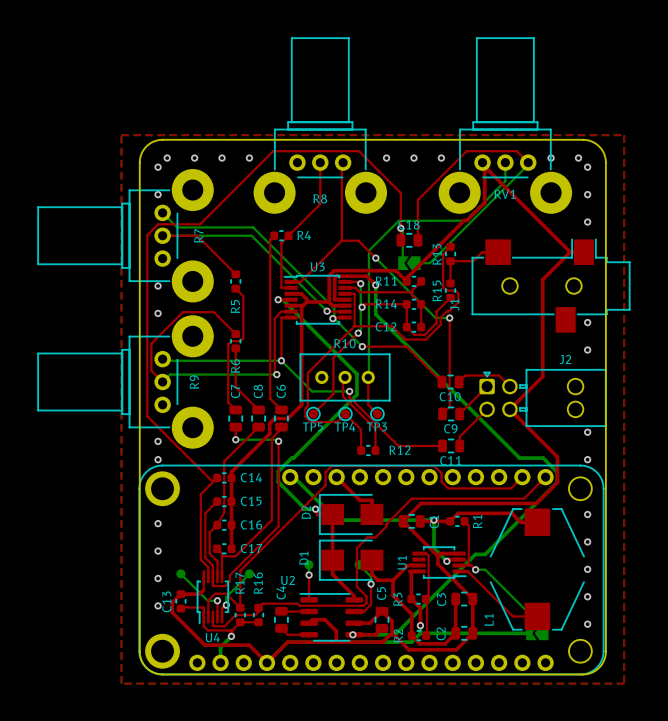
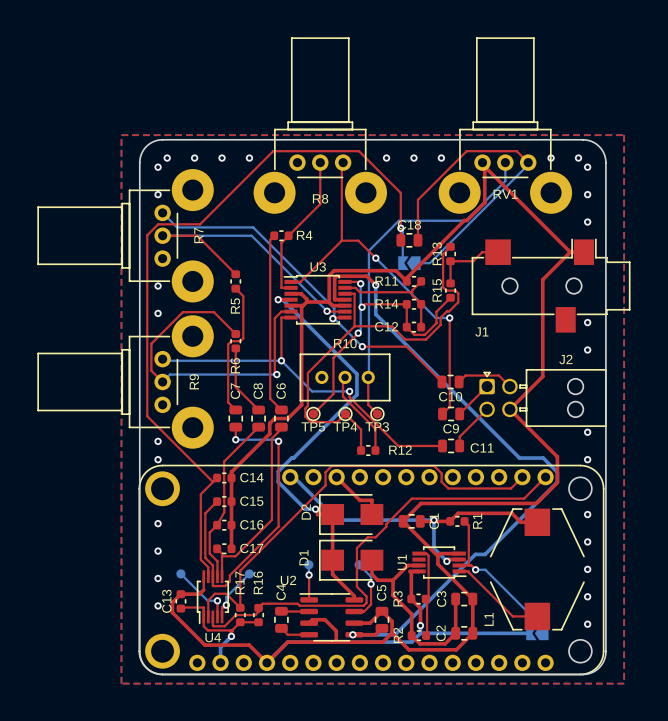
J1 name rotation: 0° (454, 305) -> 90° clockwise (481, 331)
J1 name position: J1 (454, 305) -> J1 (481, 331)
C11 name position: C11 (450, 460) -> C11 (482, 448)

